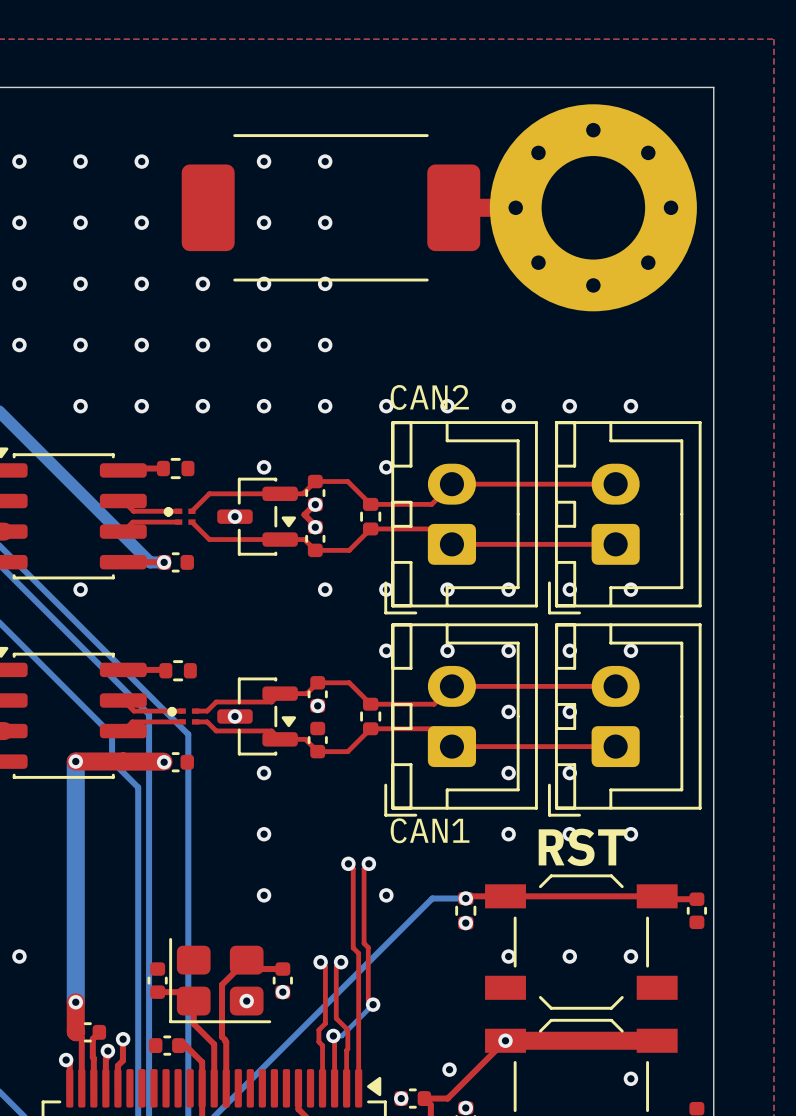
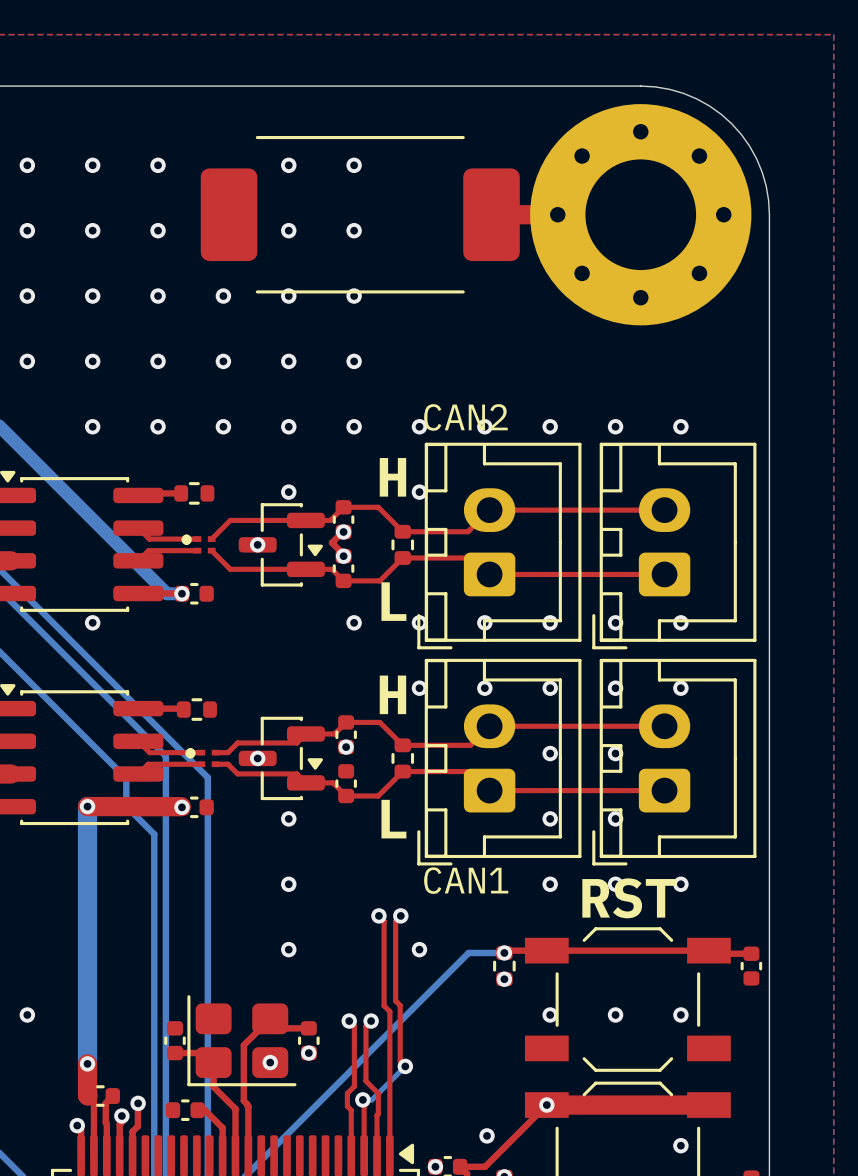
board edge: (593, 87) (713, 87) (713, 207) -> (640, 86) (669, 89) (696, 98) (720, 114) (731, 123) (749, 146) (762, 172) (768, 200) (769, 214)
text: none -> H (392, 477)
text: none -> L (393, 601)
text: none -> H (392, 694)
text: none -> L (393, 819)

